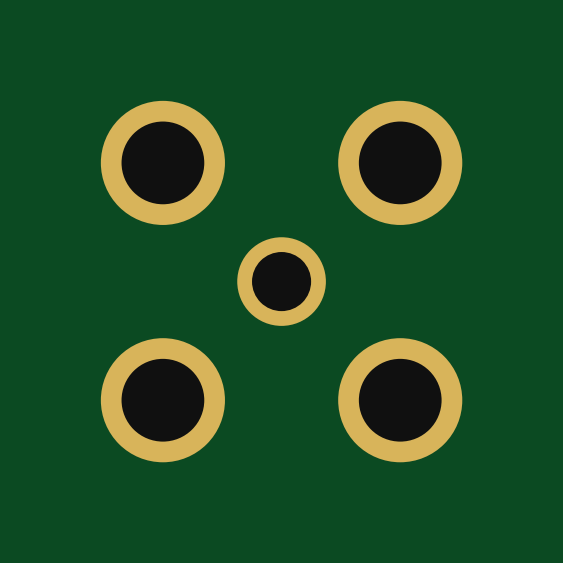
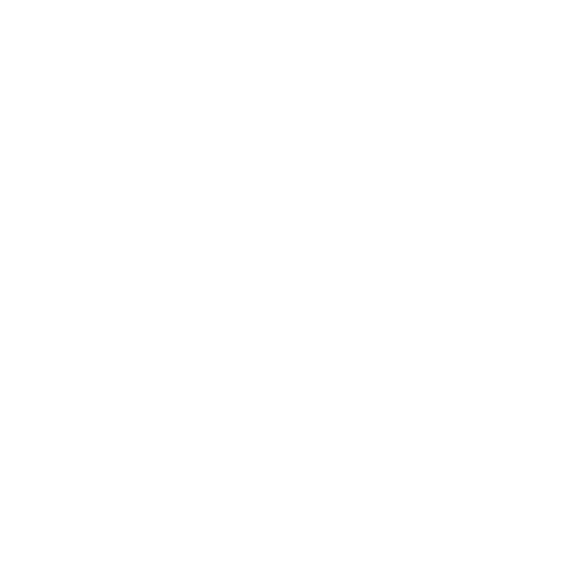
part: (281, 281) -> none

